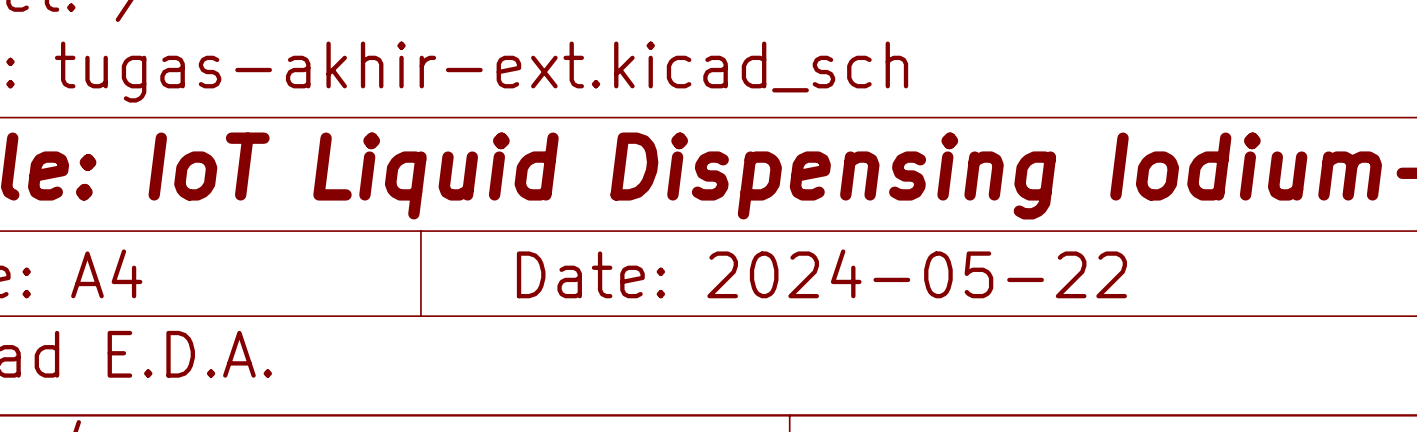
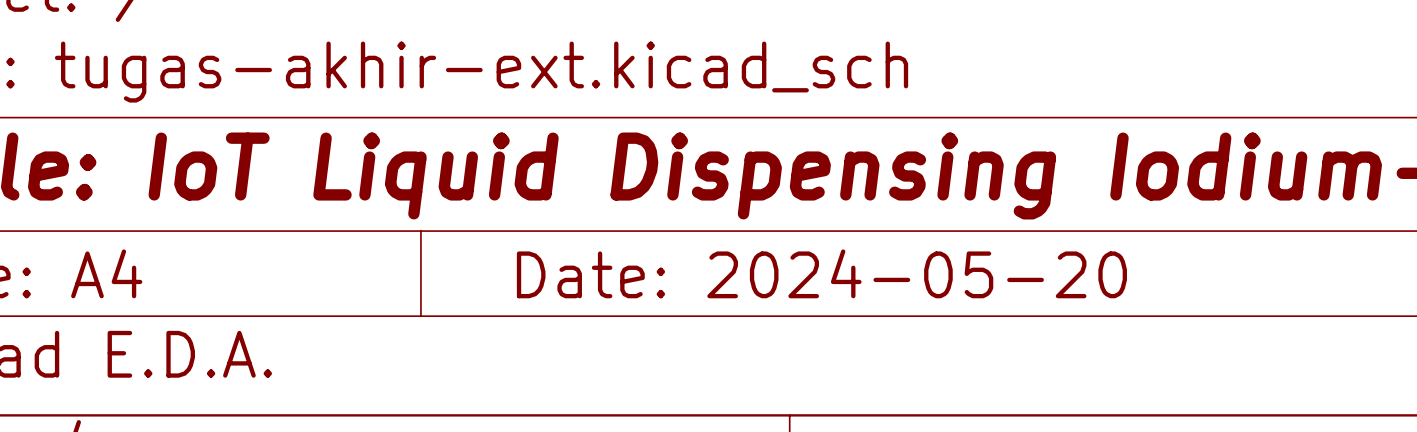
title block: Date: 2024-05-22 (821, 273) -> Date: 2024-05-20 (821, 273)

